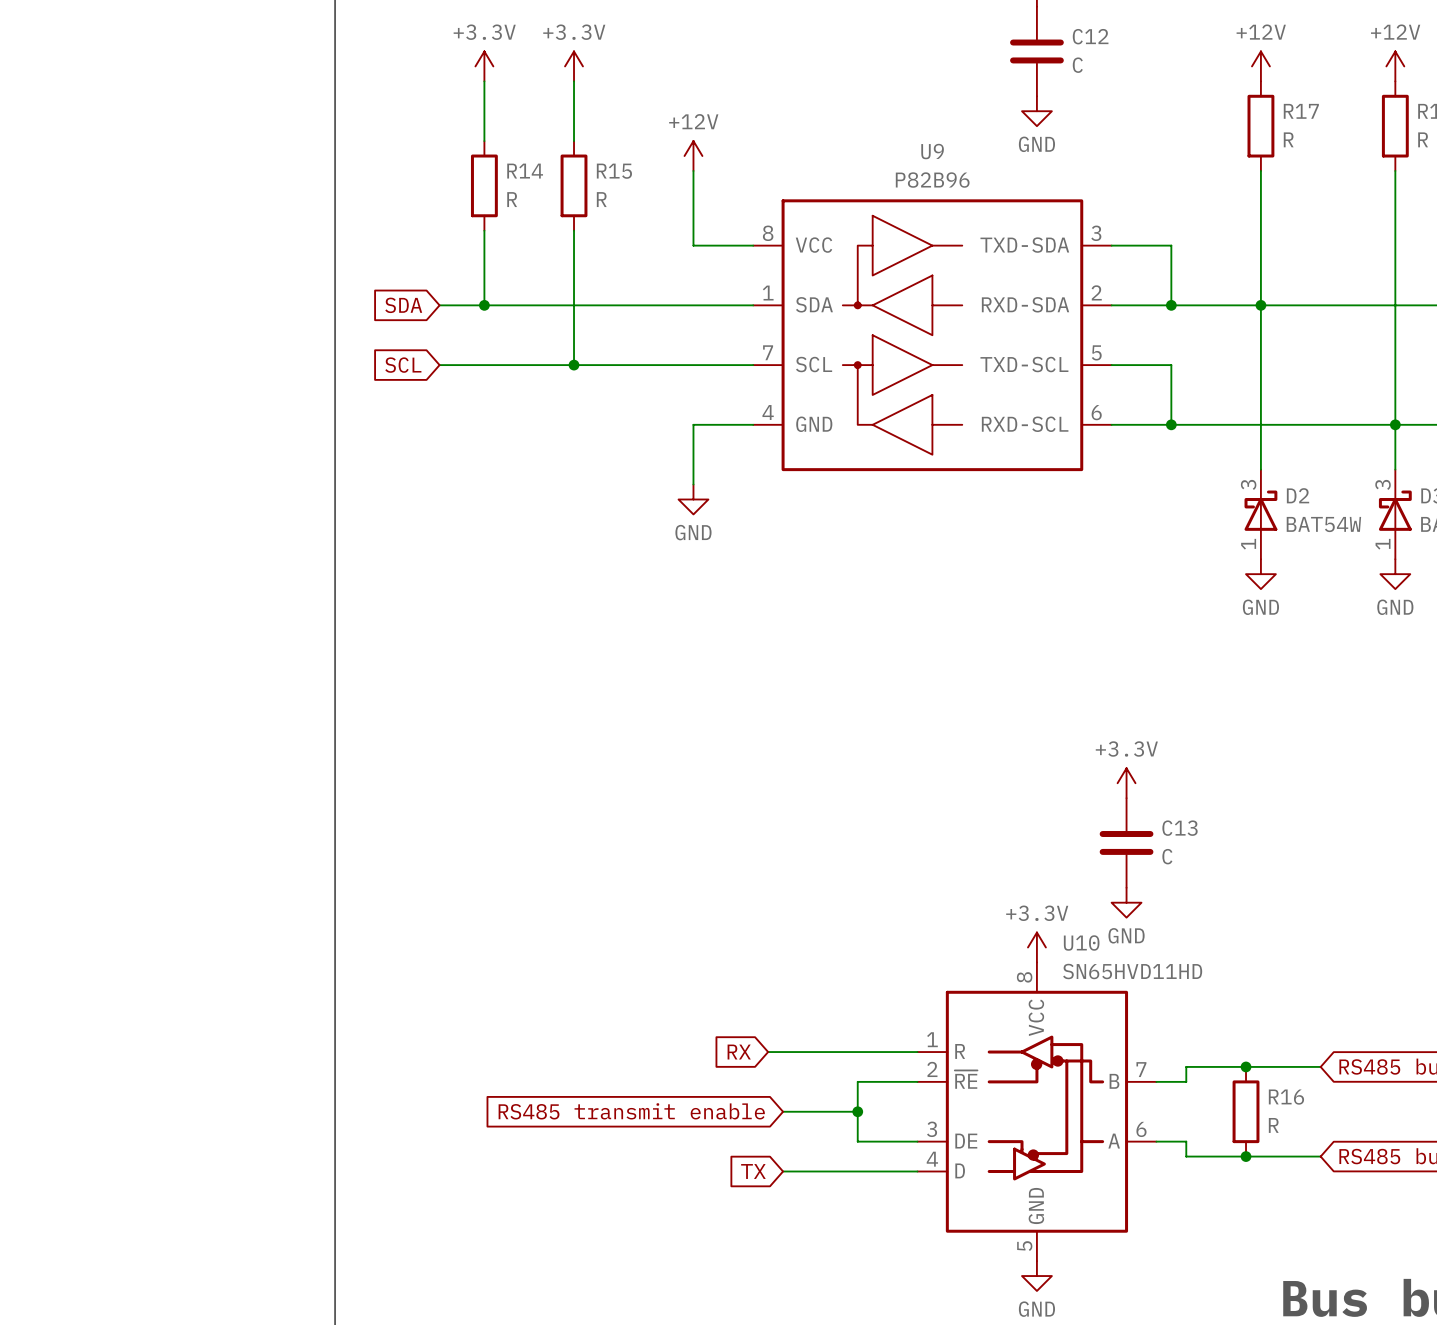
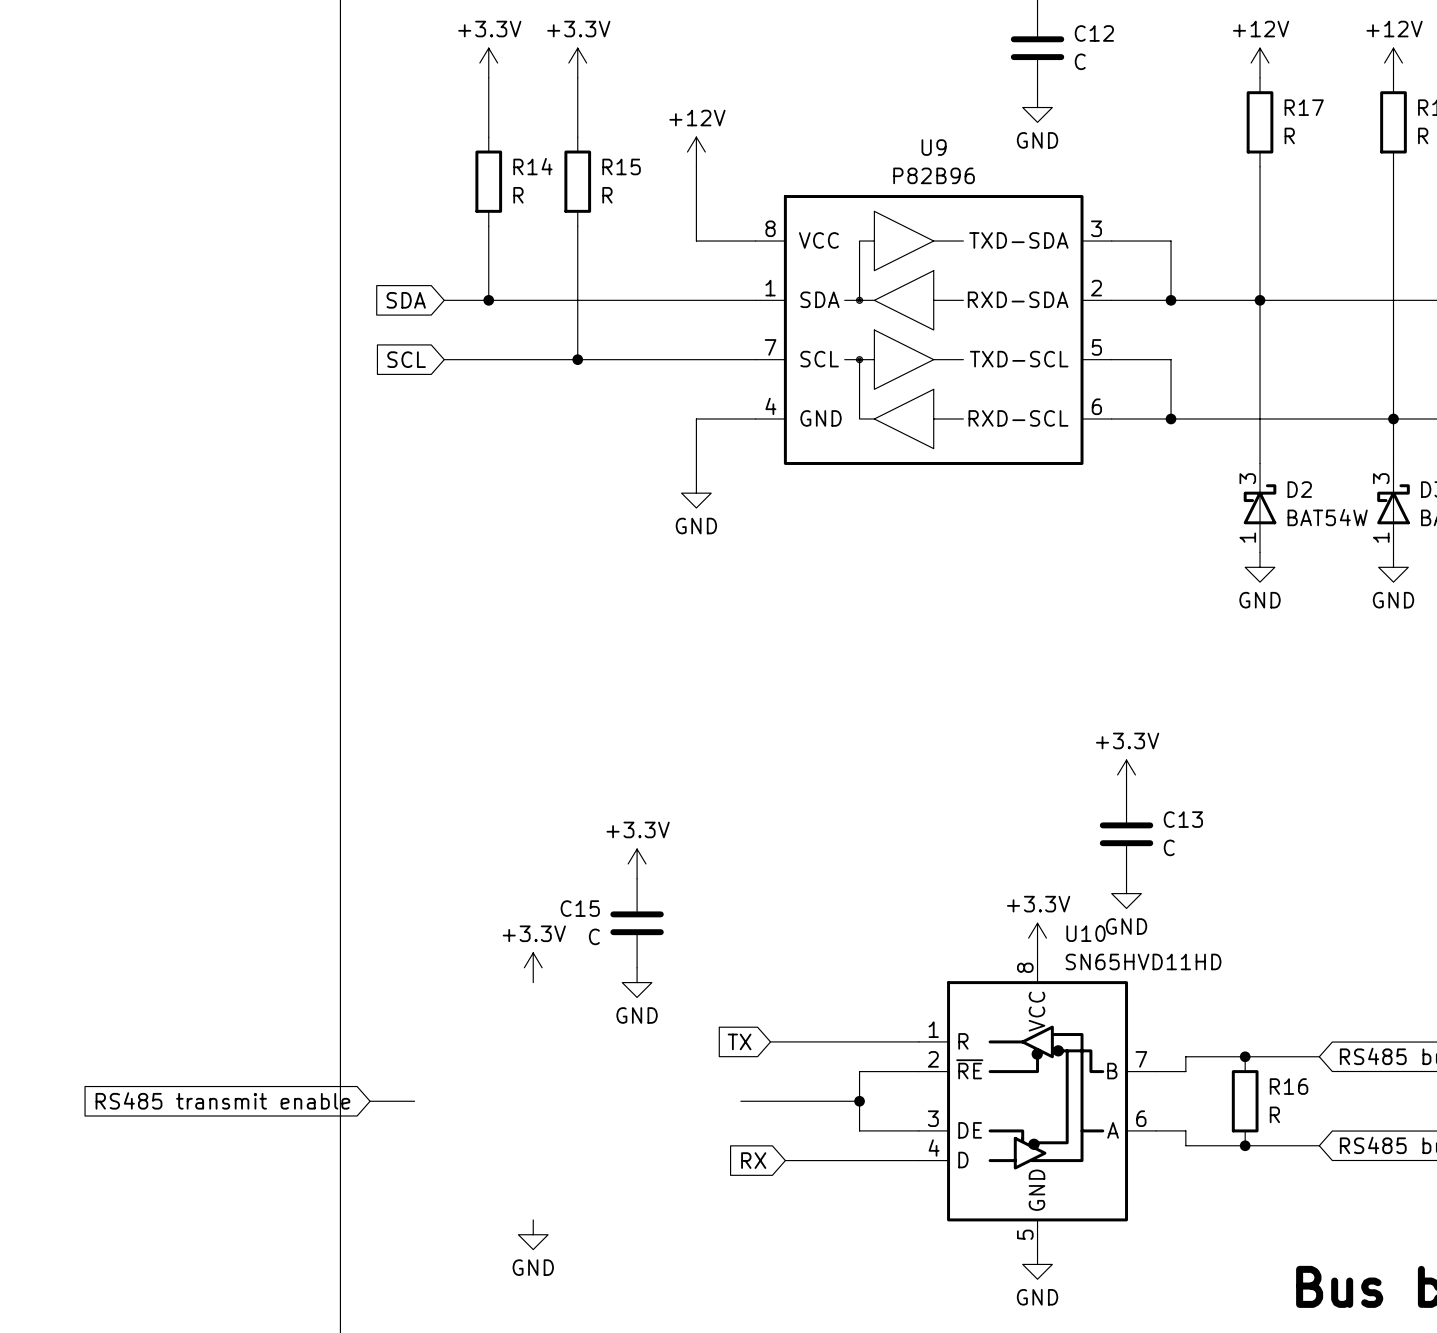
power symbol: none -> +3.3V (637, 863)
C15: none -> C (637, 923)
power symbol: none -> +3.3V (533, 967)
power symbol: none -> GND (637, 982)
global label: RX (739, 1052) -> TX (739, 1041)
global label: none -> RS485 transmit enable (222, 1100)
wire: none -> (370, 1101) (414, 1101)
global label: RS485 transmit enable (631, 1111) -> none
wire: none -> (740, 1101) (785, 1101)
global label: TX (753, 1171) -> RX (753, 1160)
power symbol: none -> GND (533, 1234)

